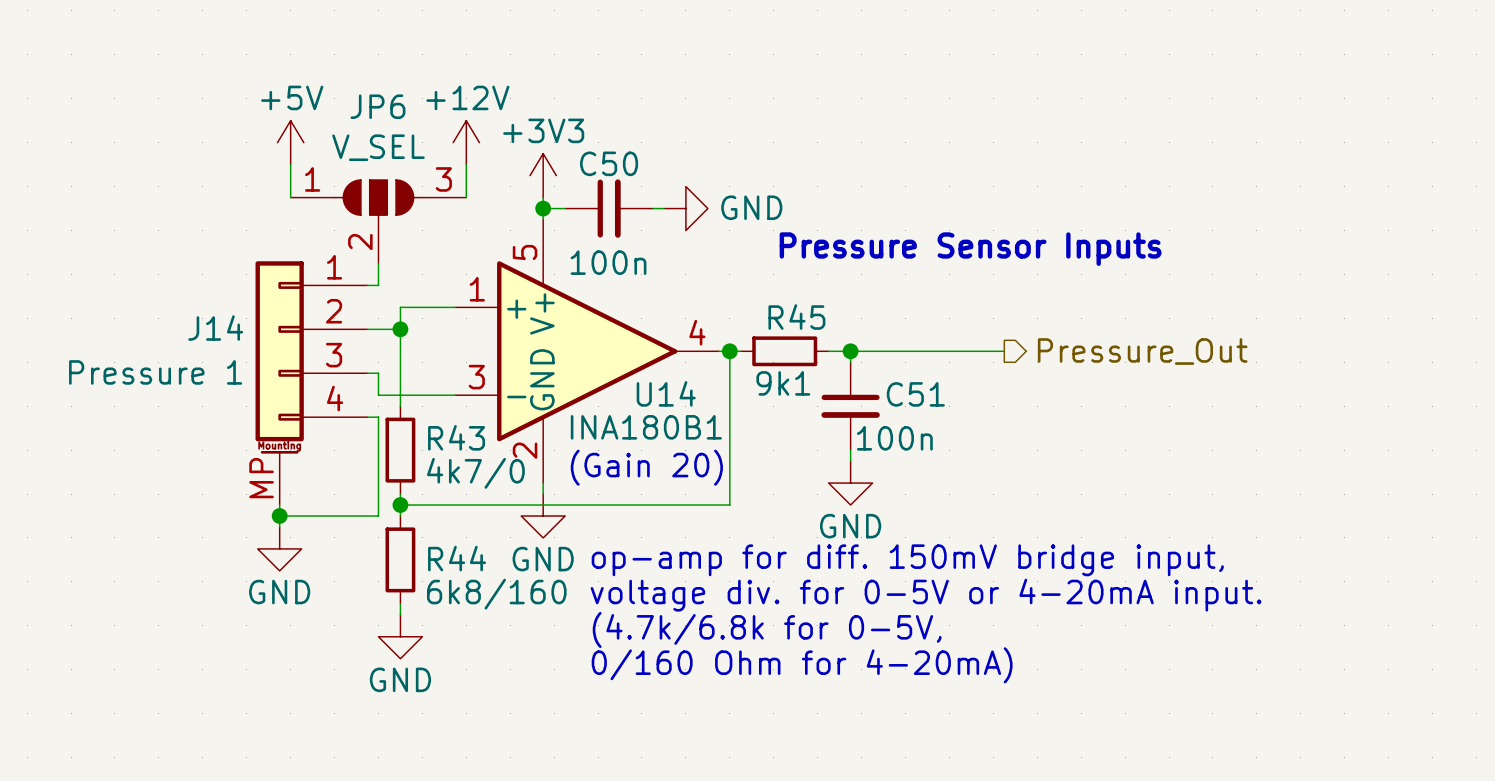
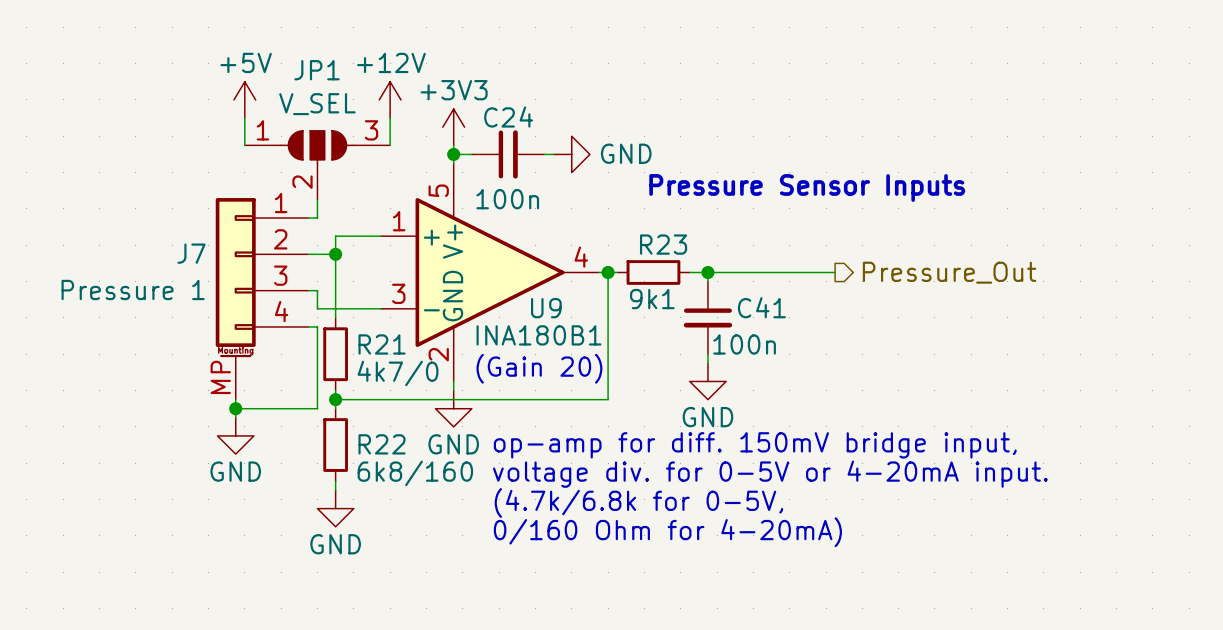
JP6 name: JP6 (377, 106) -> JP1 (317, 70)
C50 name: C50 (609, 163) -> C24 (508, 117)
R45 name: R45 (796, 317) -> R23 (663, 244)
J14 name: J14 (215, 328) -> J7 (191, 253)
U14 name: U14 (666, 393) -> U9 (546, 308)
C51 name: C51 (915, 394) -> C41 (761, 307)
R43 name: R43 (456, 437) -> R21 (382, 344)
R44 name: R44 (457, 558) -> R22 (382, 444)

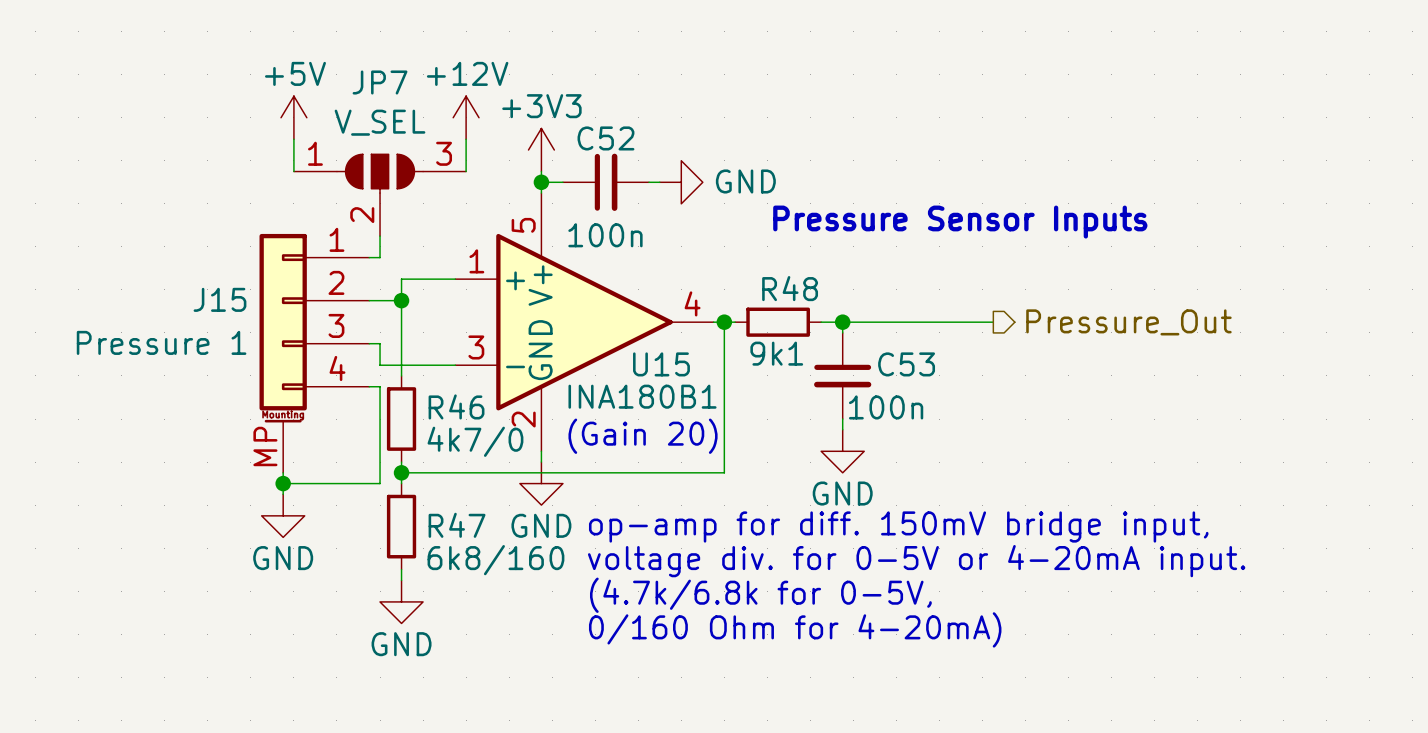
JP1 name: JP1 (317, 70) -> JP7 (380, 82)
C24 name: C24 (508, 117) -> C52 (605, 138)
R23 name: R23 (663, 244) -> R48 (790, 288)
J7 name: J7 (191, 253) -> J15 (219, 299)
C41 name: C41 (761, 307) -> C53 (906, 364)
U9 name: U9 (546, 308) -> U15 (661, 364)
R21 name: R21 (382, 344) -> R46 (456, 406)
R22 name: R22 (382, 444) -> R47 (457, 525)

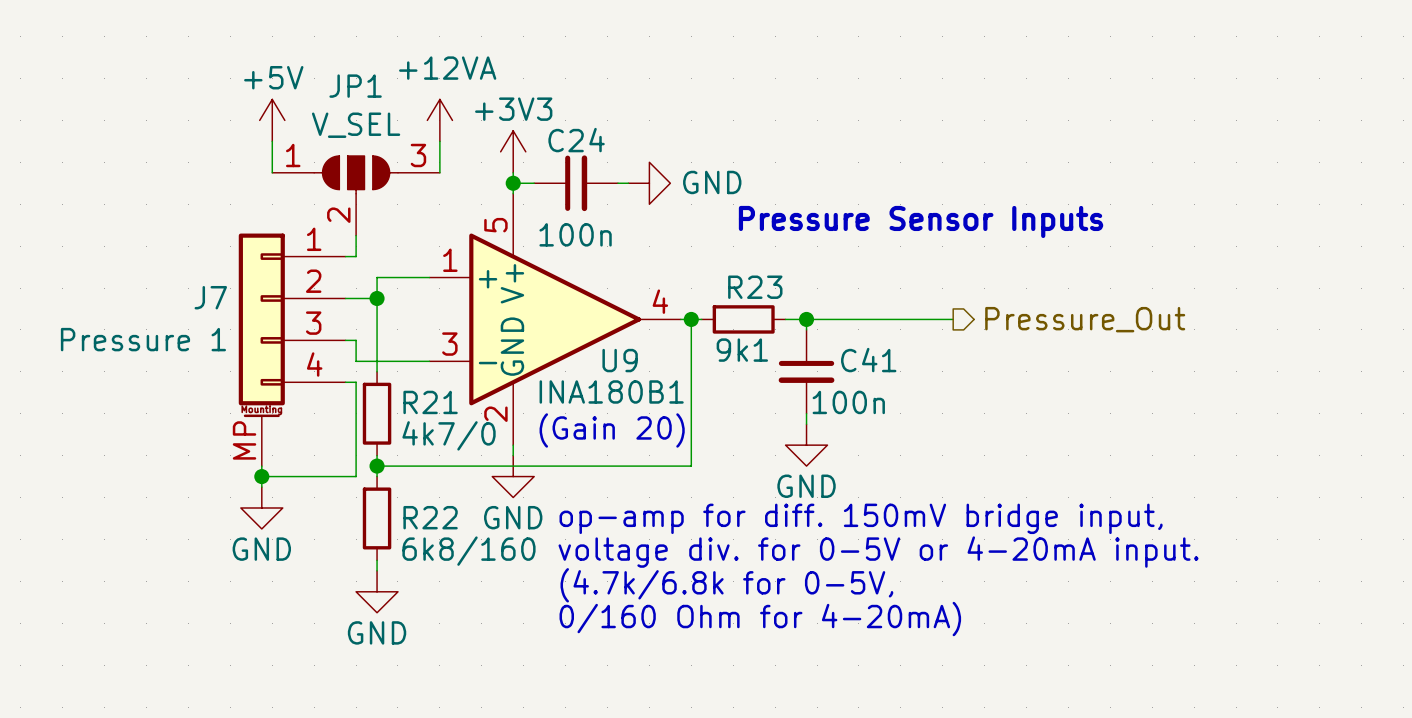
JP7 name: JP7 (380, 82) -> JP1 (355, 86)
power symbol: +12V (466, 117) -> +12VA (439, 120)
C52 name: C52 (605, 138) -> C24 (576, 140)
R48 name: R48 (790, 288) -> R23 (755, 287)
J15 name: J15 (219, 299) -> J7 (210, 297)
U15 name: U15 (661, 364) -> U9 (620, 360)
C53 name: C53 (906, 364) -> C41 (868, 360)
R46 name: R46 (456, 406) -> R21 (430, 402)
R47 name: R47 (457, 525) -> R22 (430, 517)

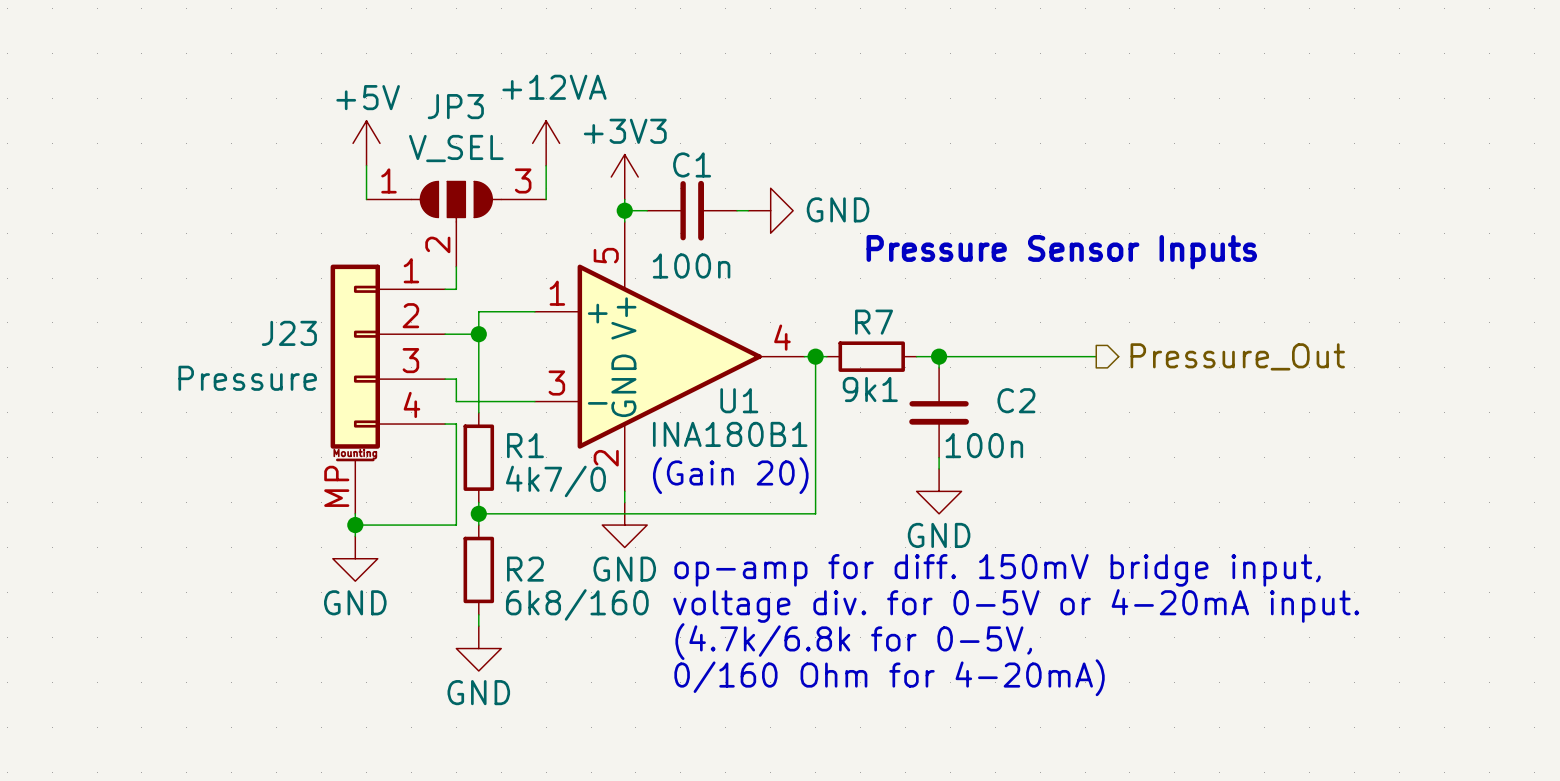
JP1 name: JP1 (355, 86) -> JP3 (455, 106)
C24 name: C24 (576, 140) -> C1 (692, 164)
R23 name: R23 (755, 287) -> R7 (874, 322)
J7 name: J7 (210, 297) -> J23 (289, 333)
J7 value: Pressure 1 (143, 339) -> Pressure (247, 378)
U9 name: U9 (620, 360) -> U1 (739, 400)
C41 name: C41 (868, 360) -> C2 (1016, 400)
R21 name: R21 (430, 402) -> R1 (525, 445)
R22 name: R22 (430, 517) -> R2 (525, 569)

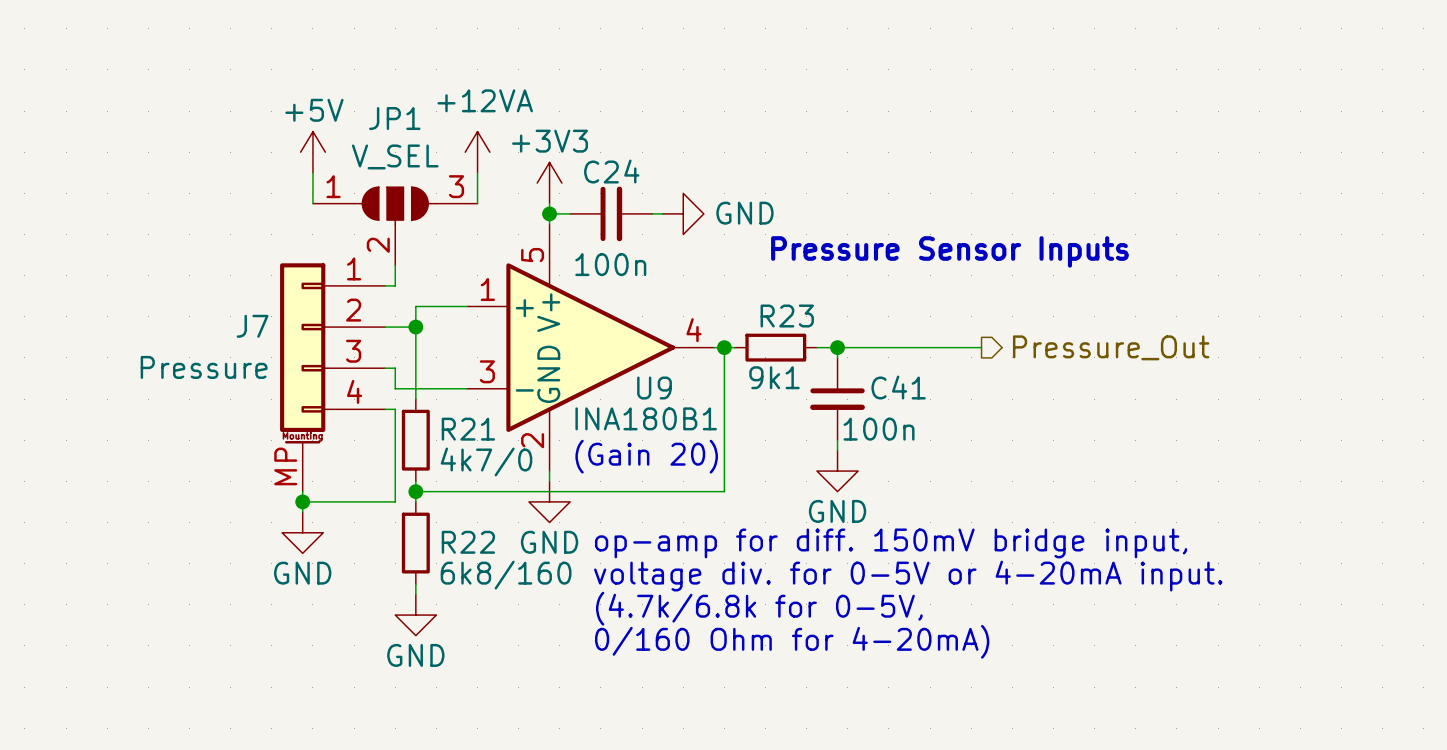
JP3 name: JP3 (455, 106) -> JP1 (394, 118)
C1 name: C1 (692, 164) -> C24 (611, 171)
R7 name: R7 (874, 322) -> R23 (787, 316)
J23 name: J23 (289, 333) -> J7 (252, 326)
U1 name: U1 (739, 400) -> U9 (654, 388)
C2 name: C2 (1016, 400) -> C41 (898, 387)
R1 name: R1 (525, 445) -> R21 (468, 429)
R2 name: R2 (525, 569) -> R22 (468, 542)

